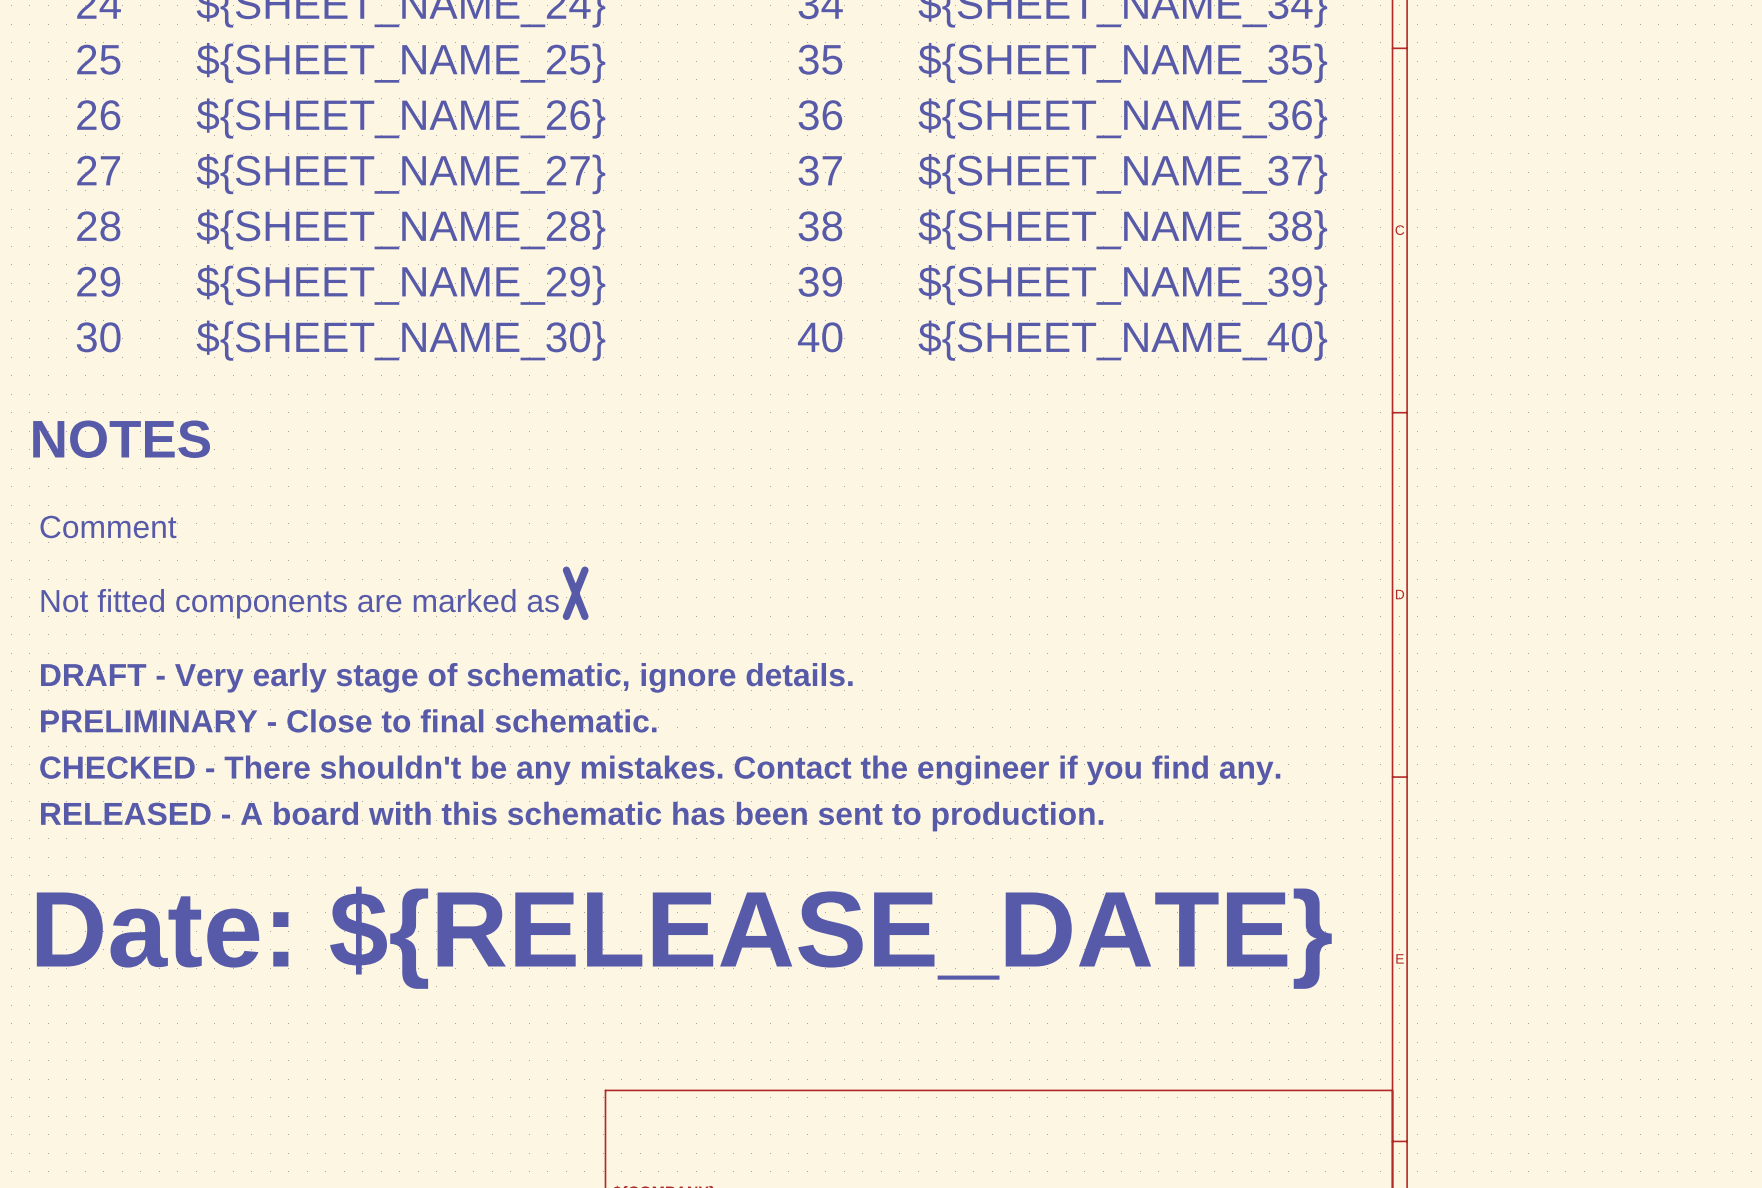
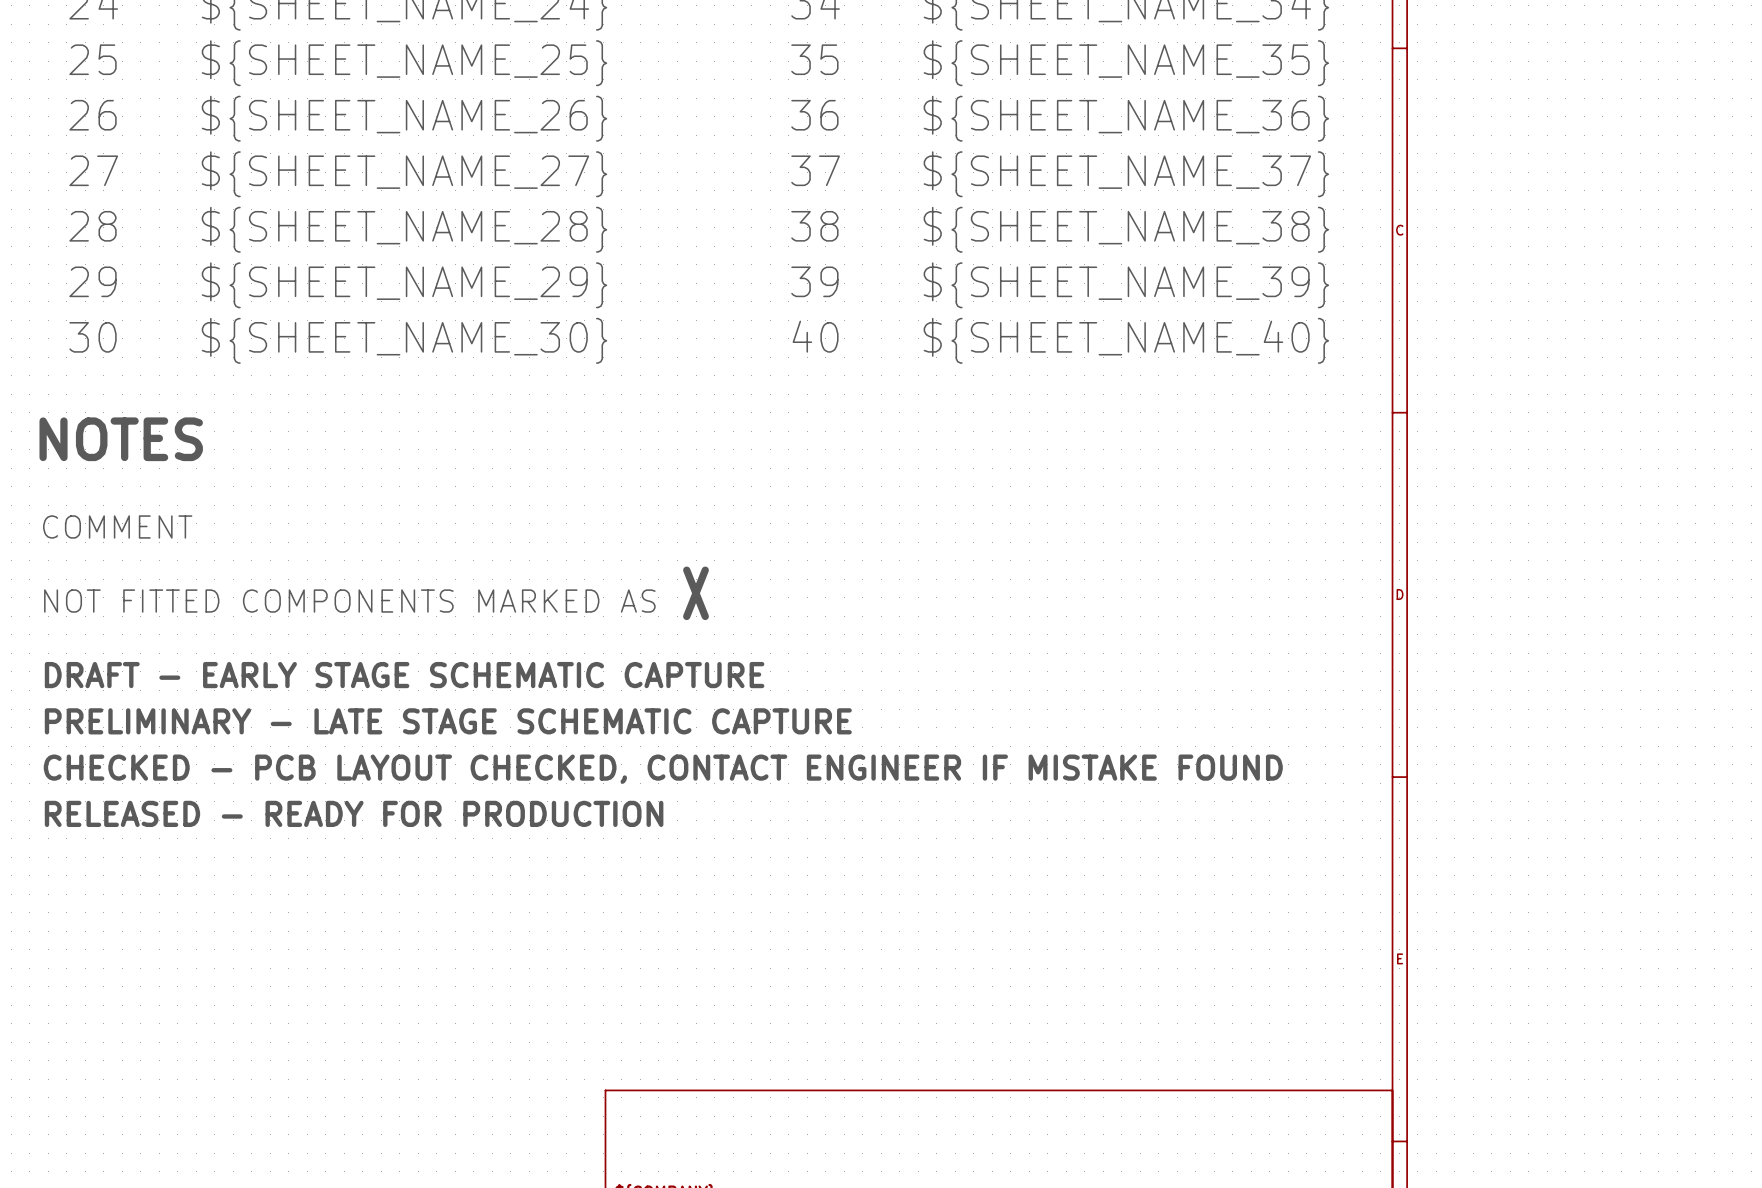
text: Comment (108, 526) -> COMMENT (117, 526)
line: (566, 570) (584, 616) -> (686, 570) (705, 616)
line: (584, 570) (566, 616) -> (705, 570) (686, 616)
text: Not fitted components are marked as (300, 603) -> NOT FITTED COMPONENTS MARKED AS (349, 601)
text: DRAFT - Very early stage of schematic, ignore details. (446, 677) -> DRAFT - EARLY STAGE SCHEMATIC CAPTURE (404, 675)
text: PRELIMINARY - Close to final schematic. (348, 720) -> PRELIMINARY - LATE STAGE SCHEMATIC CAPTURE (448, 721)
text: CHECKED - There shouldn't be any mistakes. Contact the engineer if you find any. (660, 770) -> CHECKED - PCB LAYOUT CHECKED, CONTACT ENGINEER IF MISTAKE FOUND (663, 769)
text: RELEASED - A board with this schematic has been sent to production. (572, 816) -> RELEASED - READY FOR PRODUCTION (354, 813)
text: Date: ${RELEASE_DATE} (684, 937) -> none

